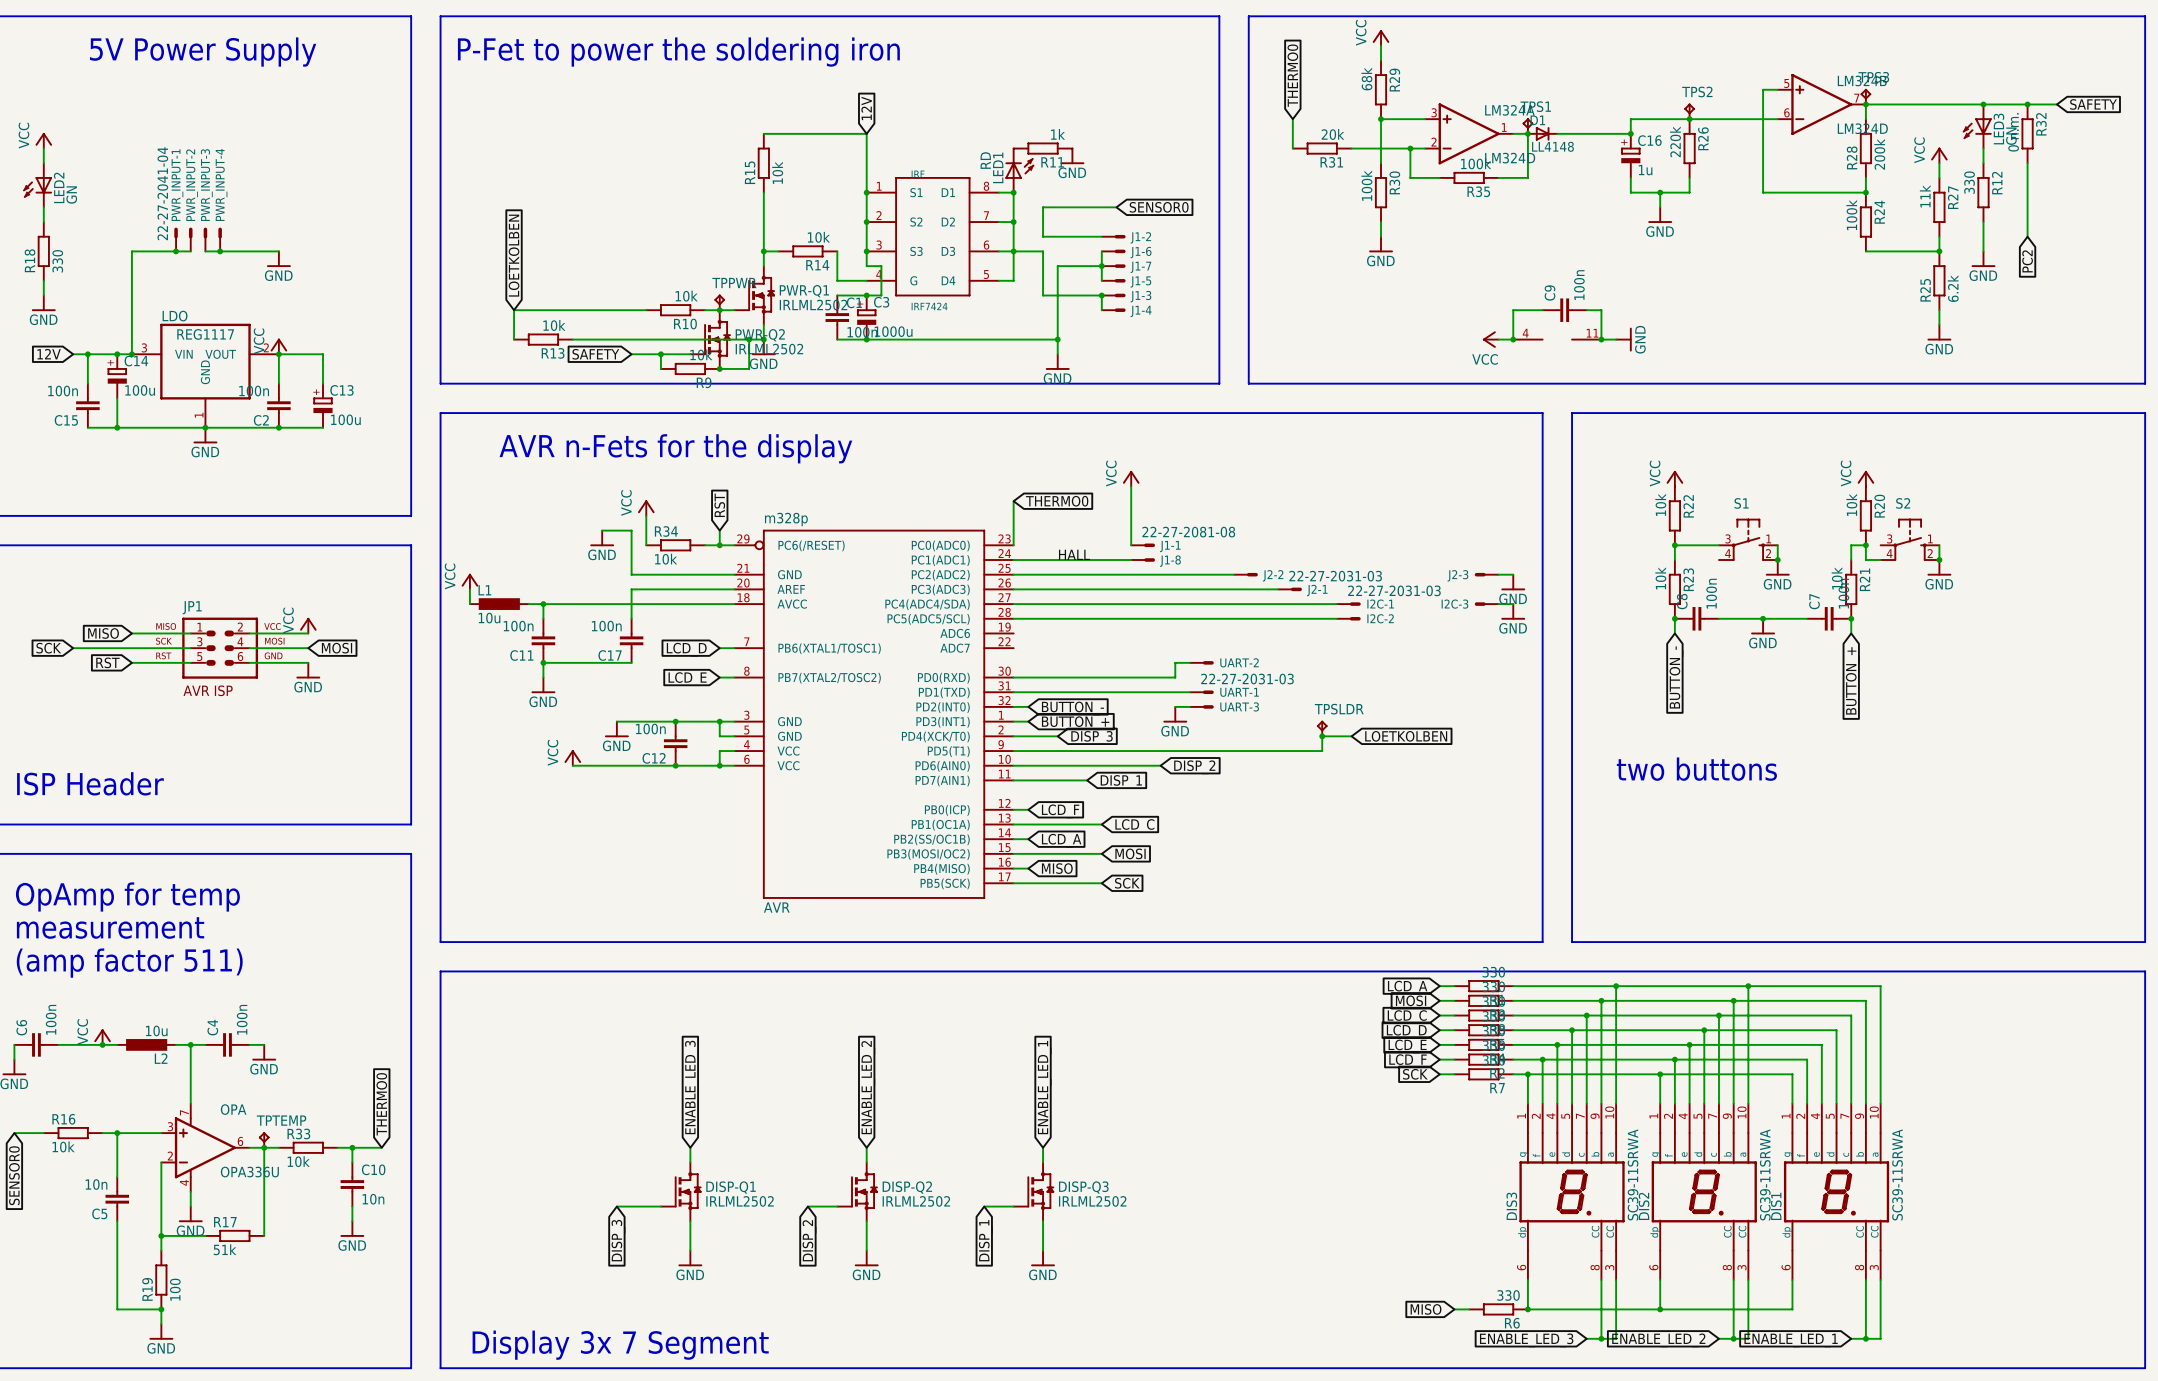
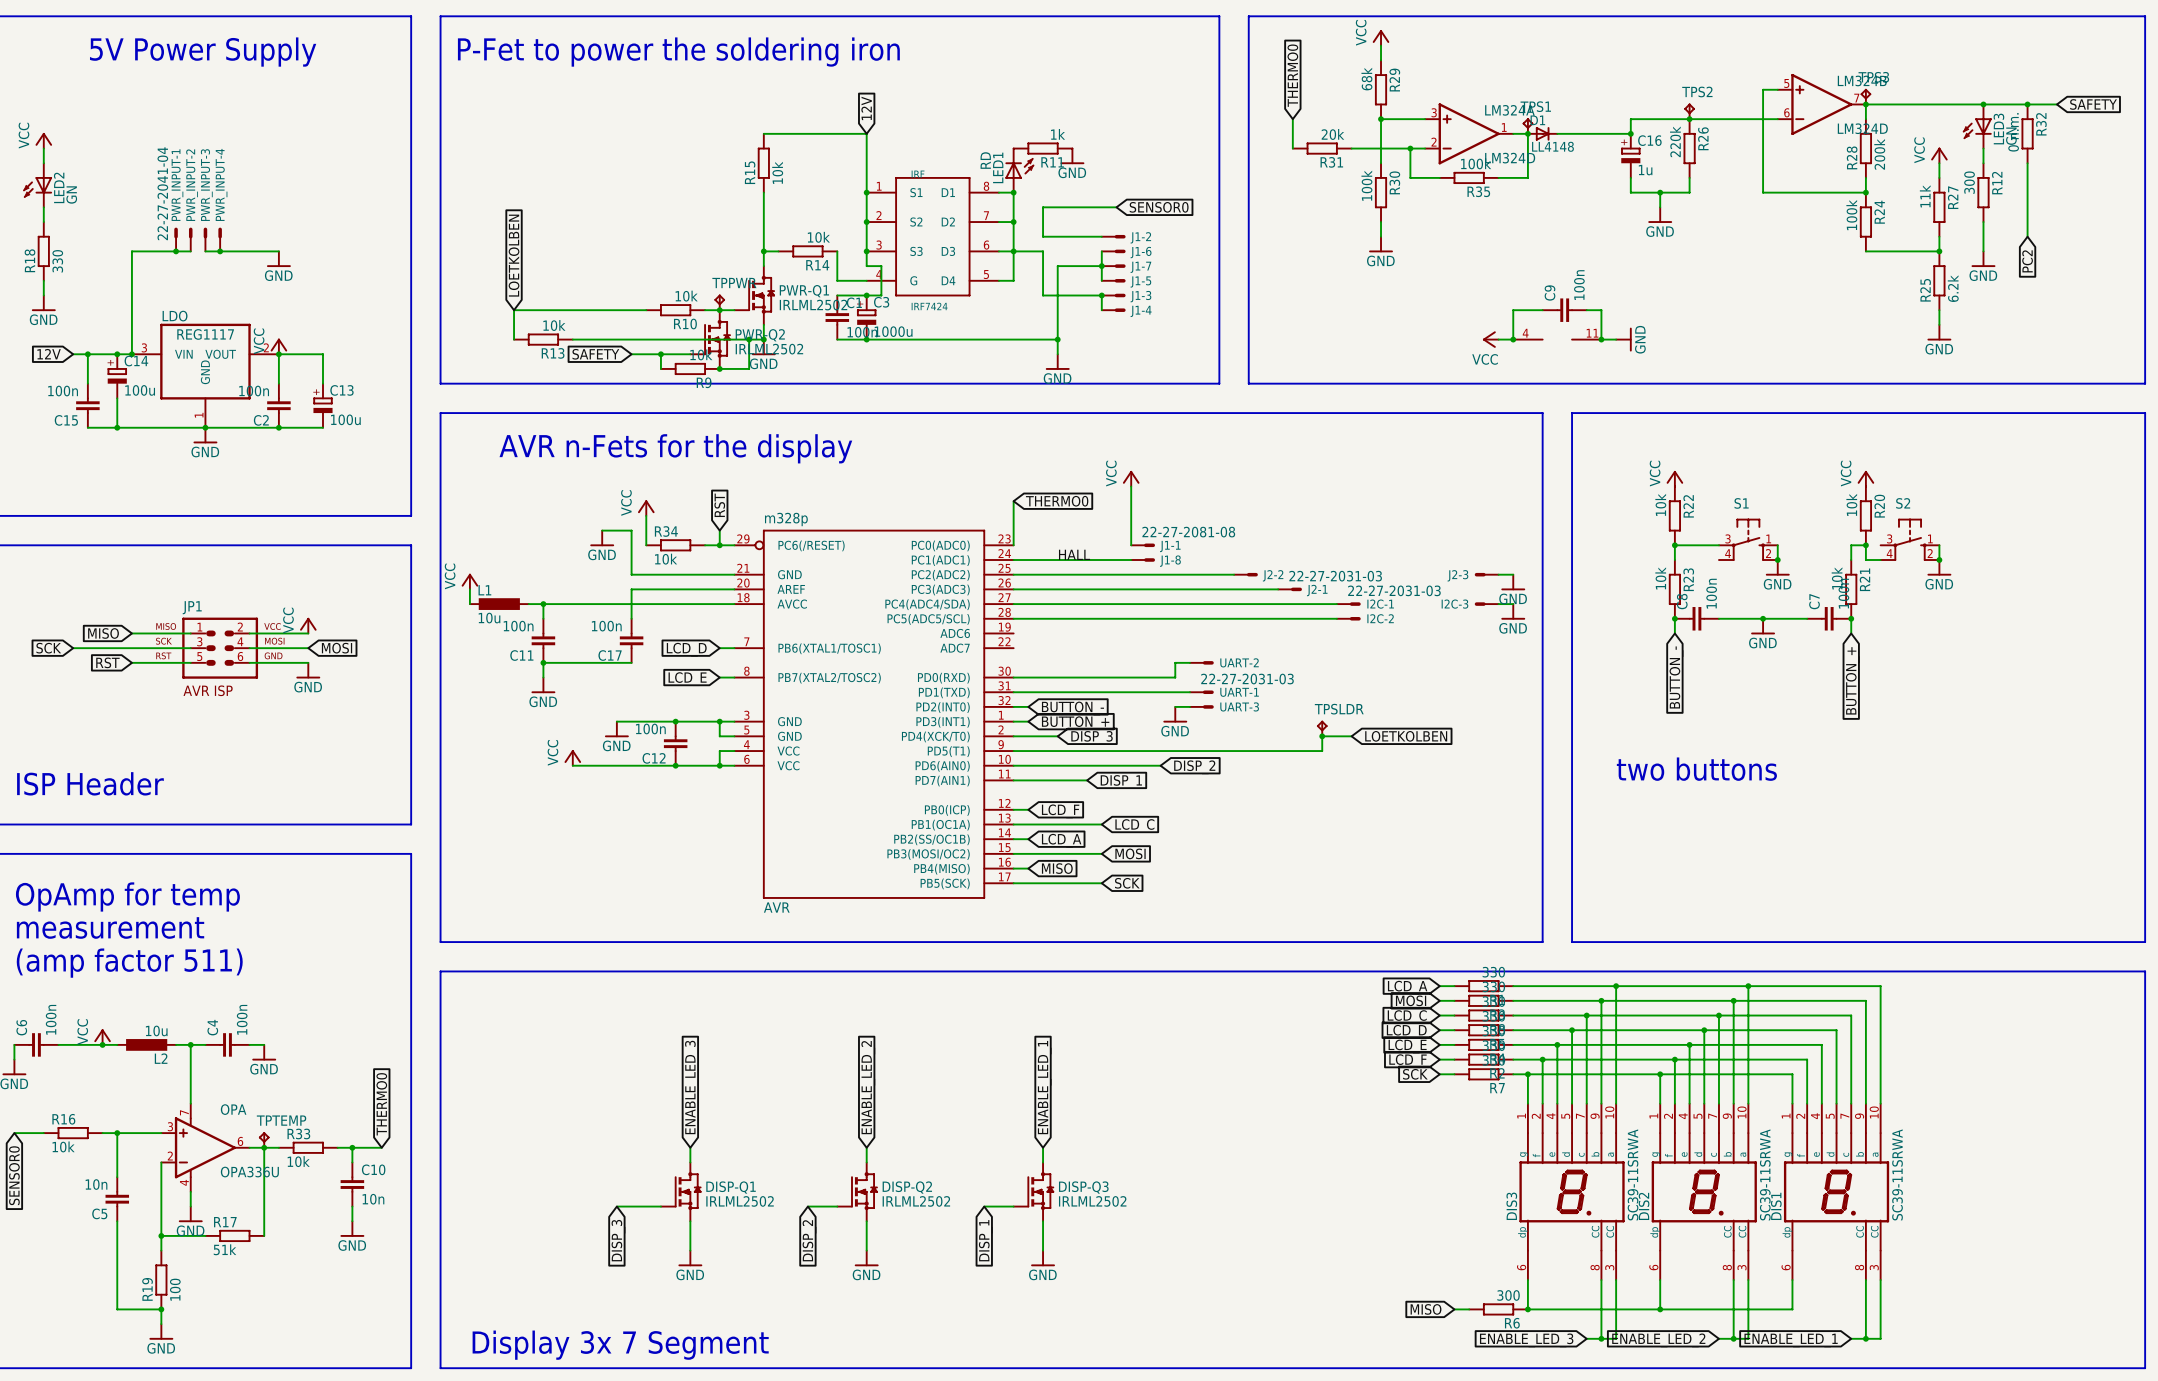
R12 value: 330 (1969, 182) -> 300 (1969, 182)
R6 value: 330 (1508, 1295) -> 300 (1508, 1295)

